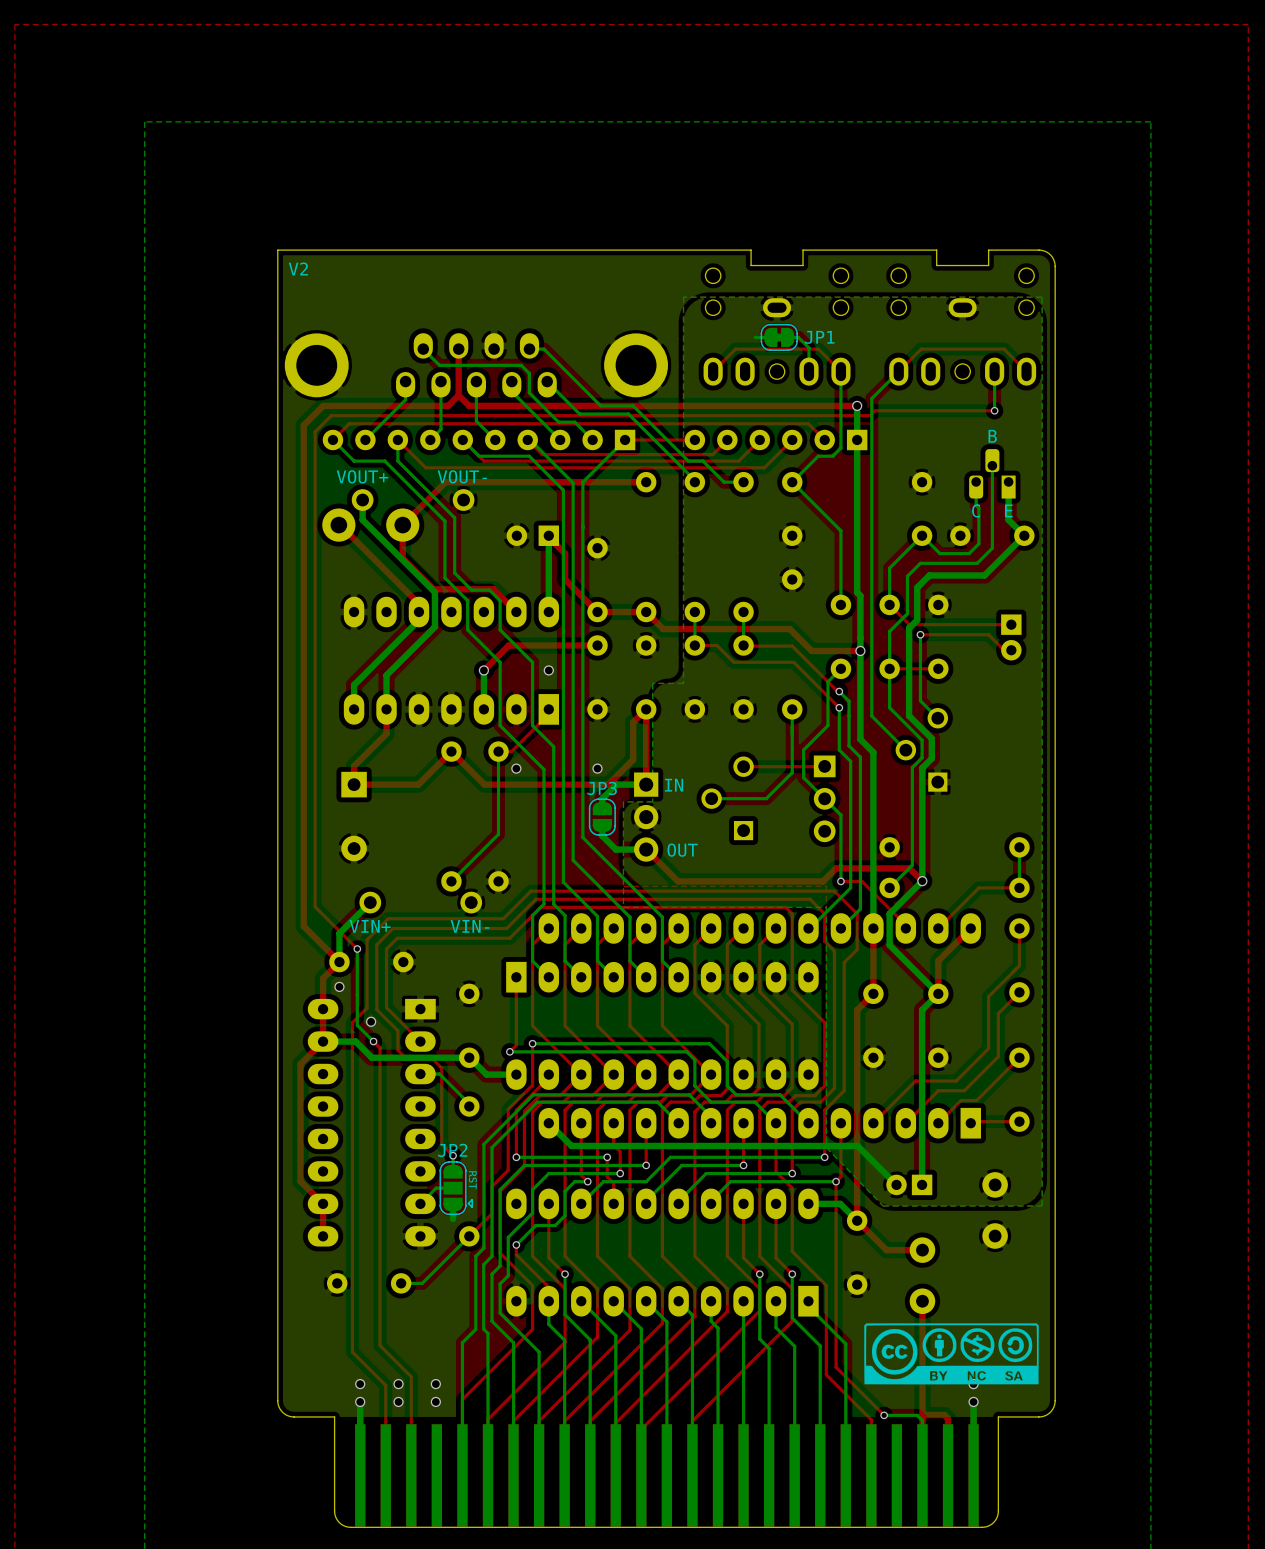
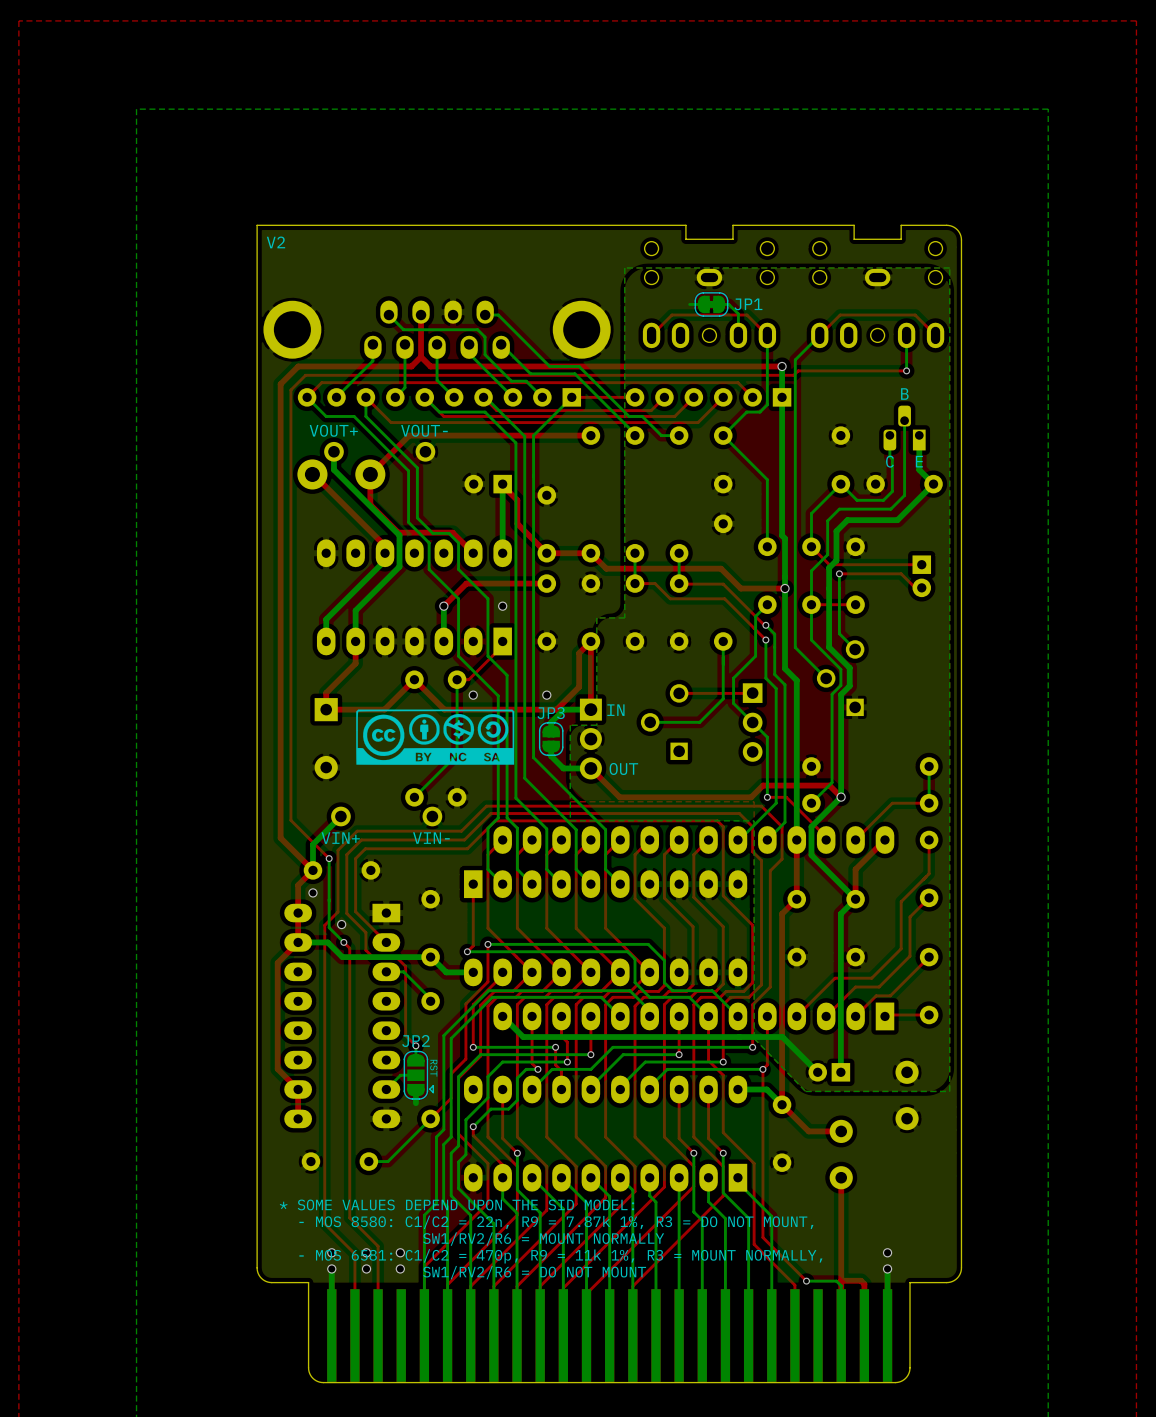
drawing: none -> [356, 709, 515, 765]
drawing: [864, 1323, 1039, 1385] -> none
text: none -> * SOME VALUES DEPEND UPON THE SID MODEL: (456, 1204)
text: none -> - MOS 8580: C1/C2 = 22n, R9 = 7.87k 1%, R3 = DO NOT MOUNT, (556, 1222)
text: none -> SW1/RV2/R6 = MOUNT NORMALLY (543, 1239)
text: none -> - MOS 6581: C1/C2 = 470p, R9 = 11k 1%, R3 = MOUNT NORMALLY, (560, 1256)
text: none -> SW1/RV2/R6 = DO NOT MOUNT (534, 1272)

